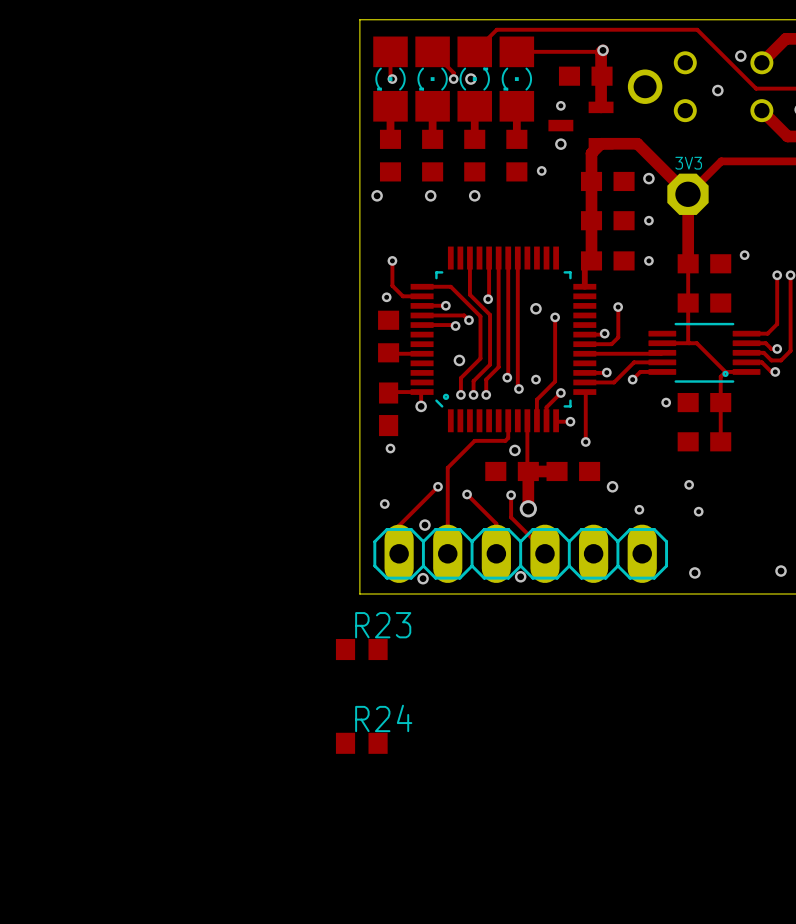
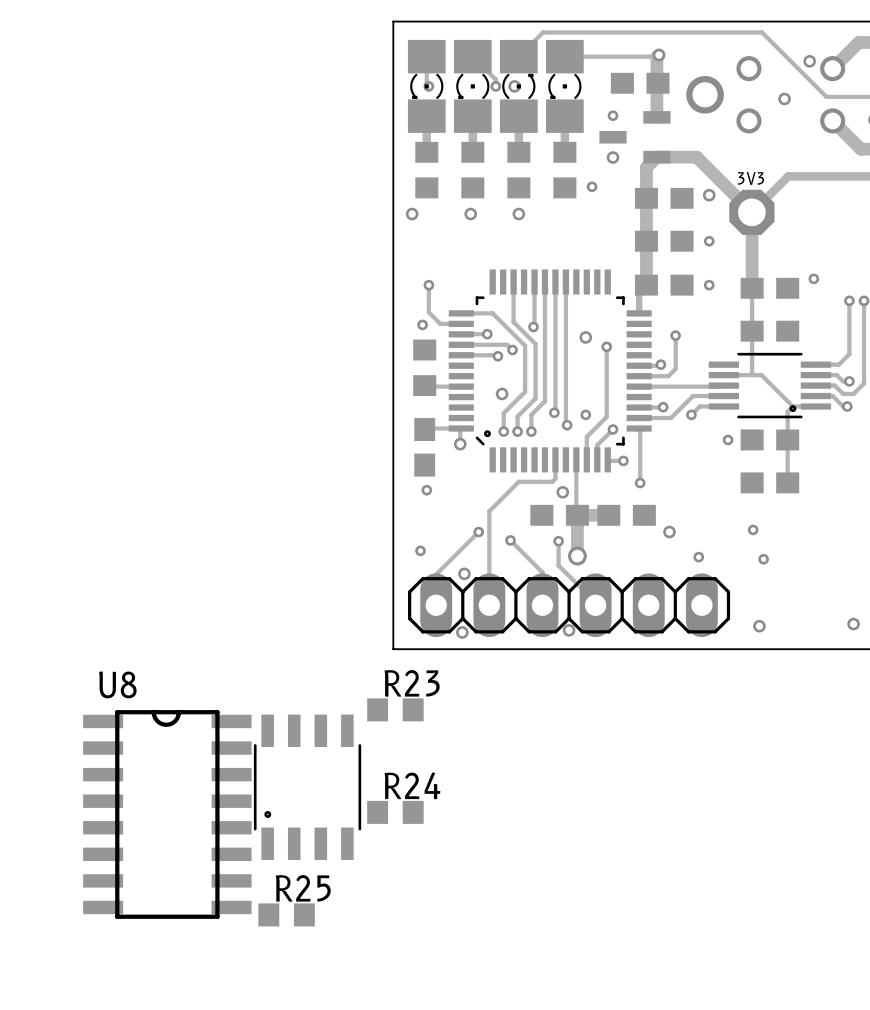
part: none -> (307, 787)
U8: none -> (167, 814)
R25: none -> (286, 914)

